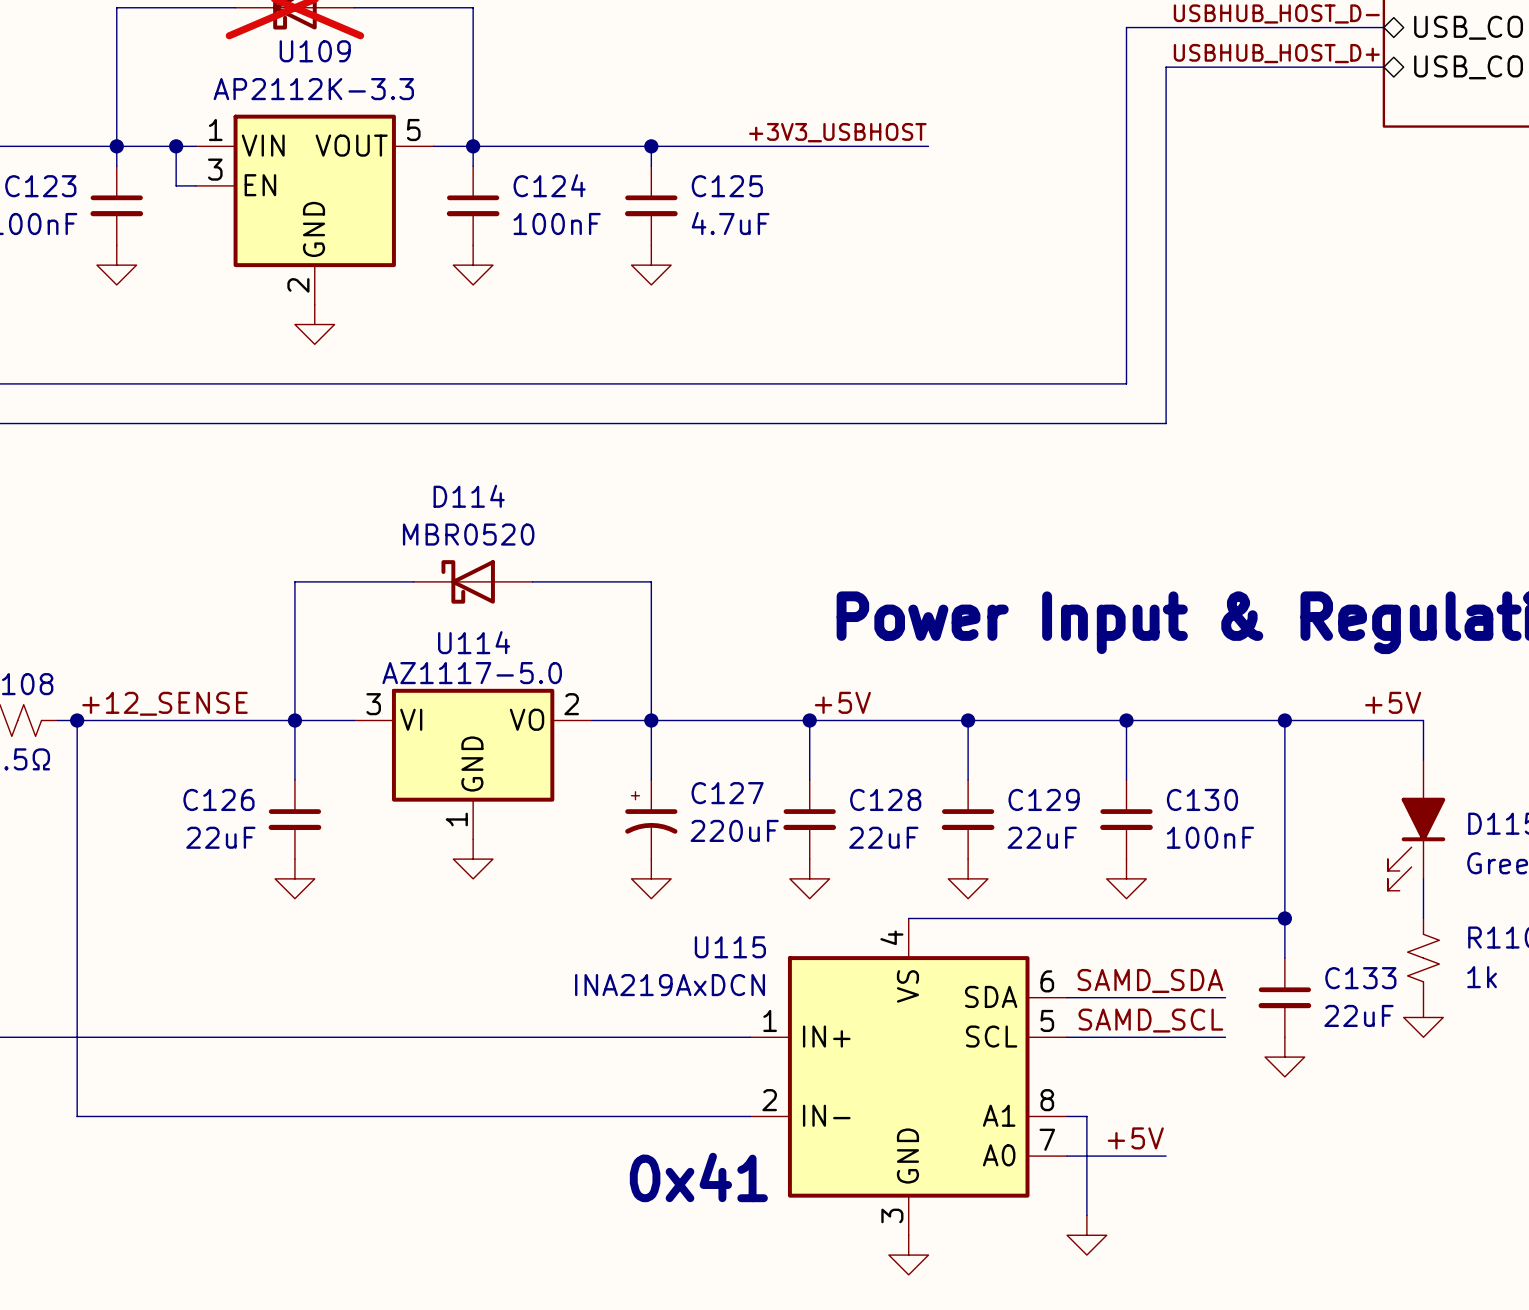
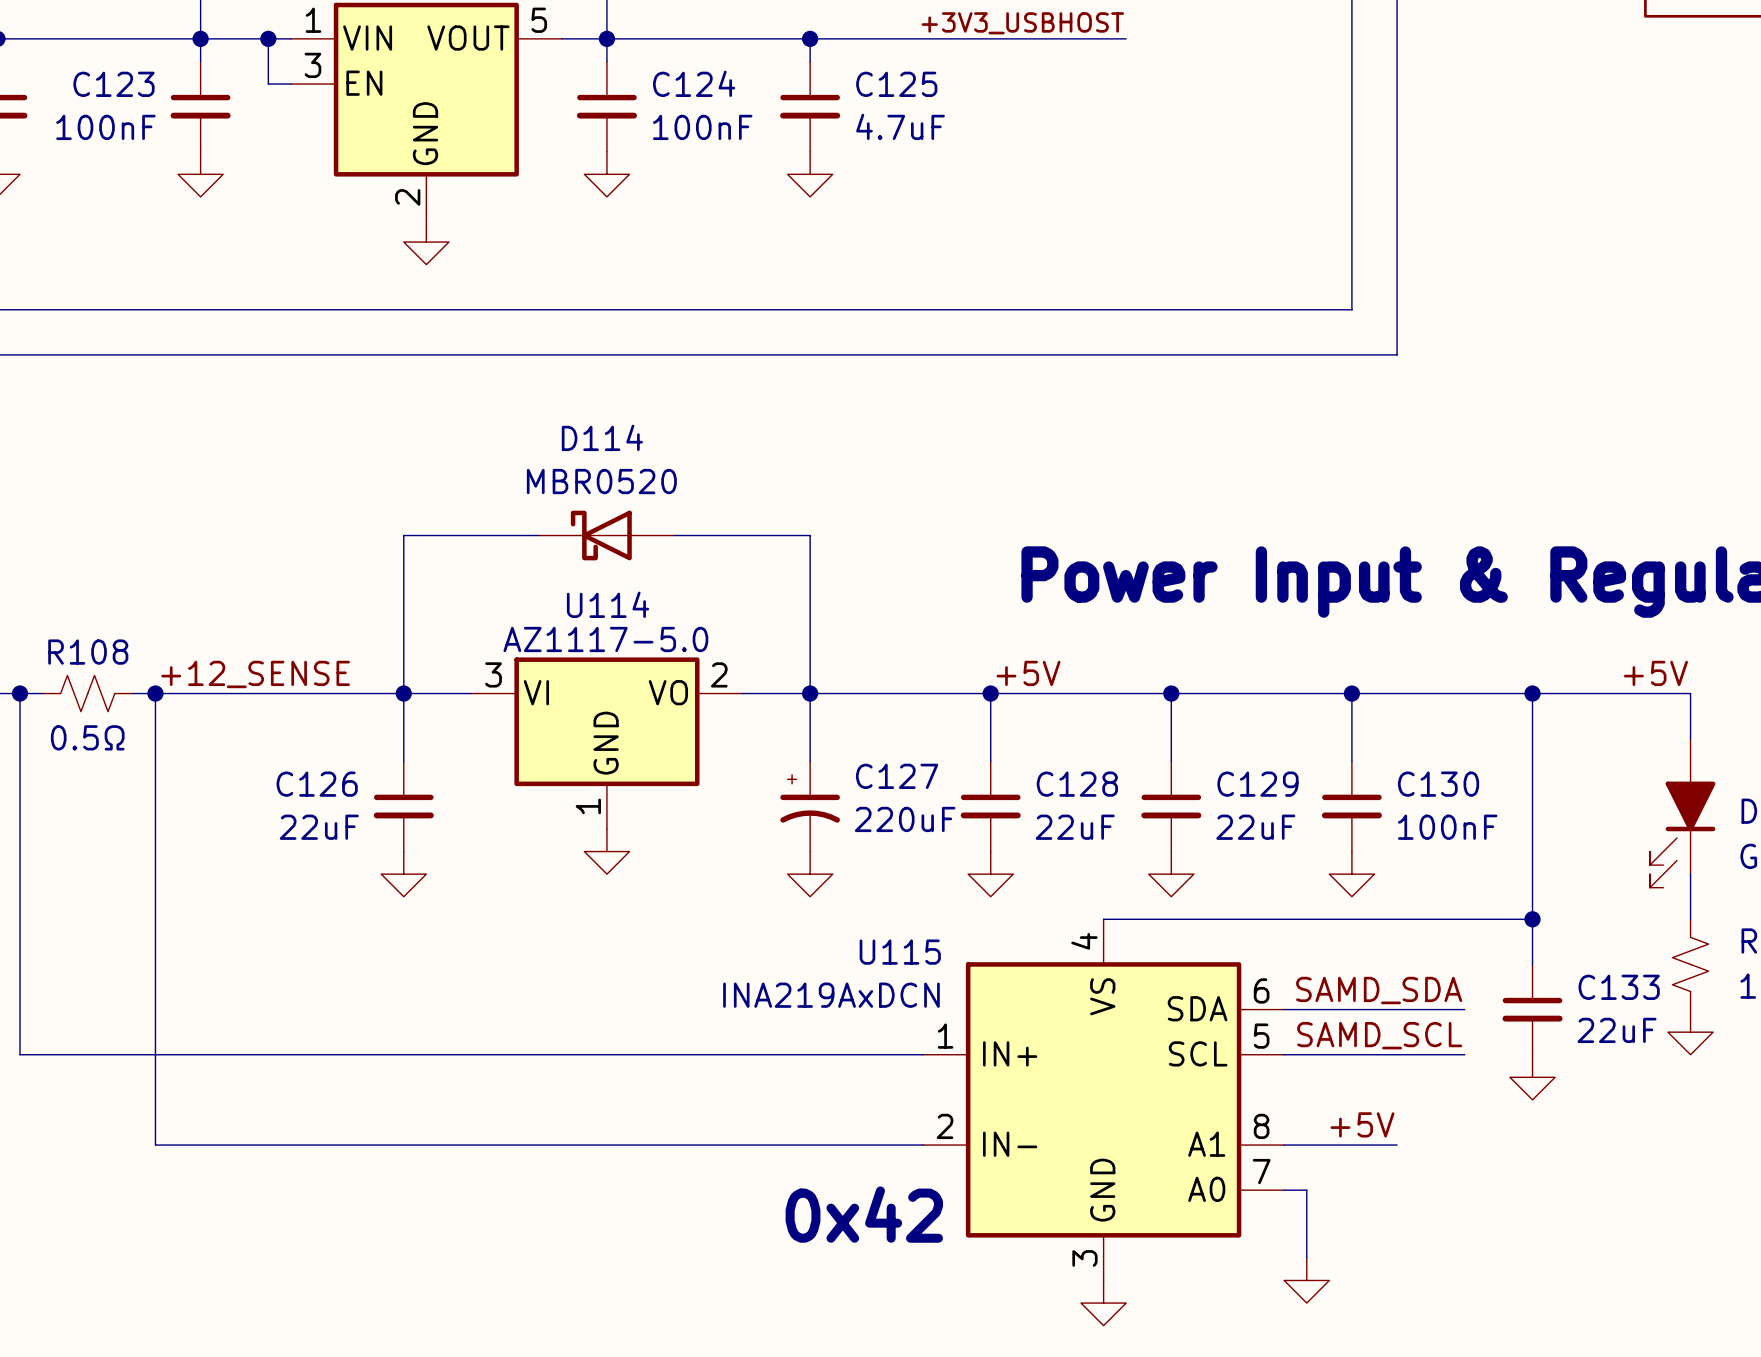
wire: (1086, 1116) (1086, 1156) (1166, 1156) -> (1306, 1145) (1397, 1145)
label position: +5V (1135, 1138) -> +5V (1362, 1124)
text: 0x41 (698, 1177) -> 0x42 (864, 1214)

